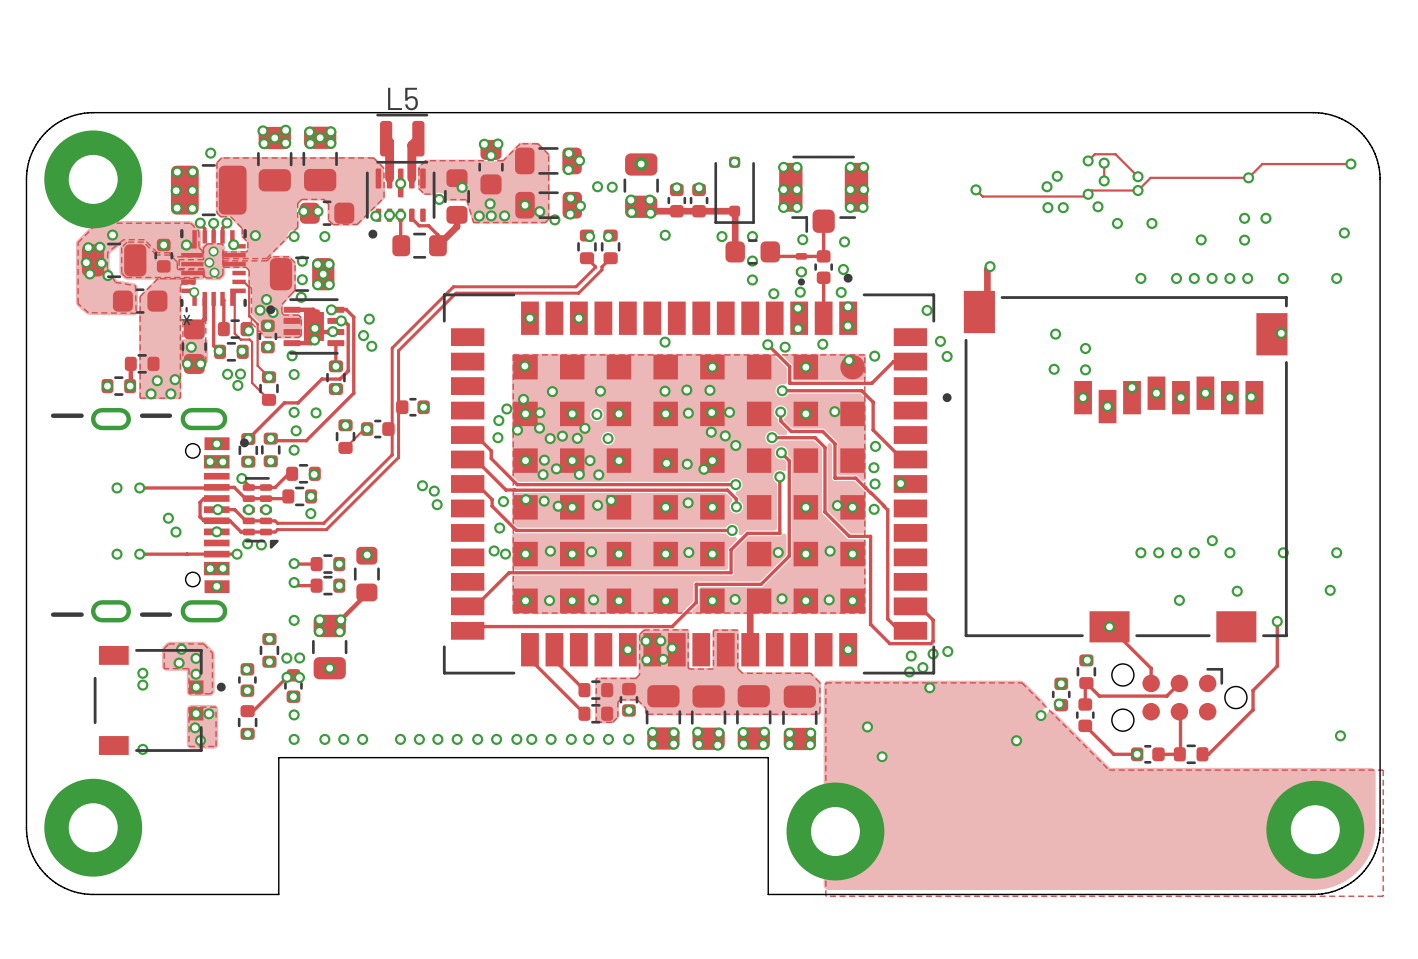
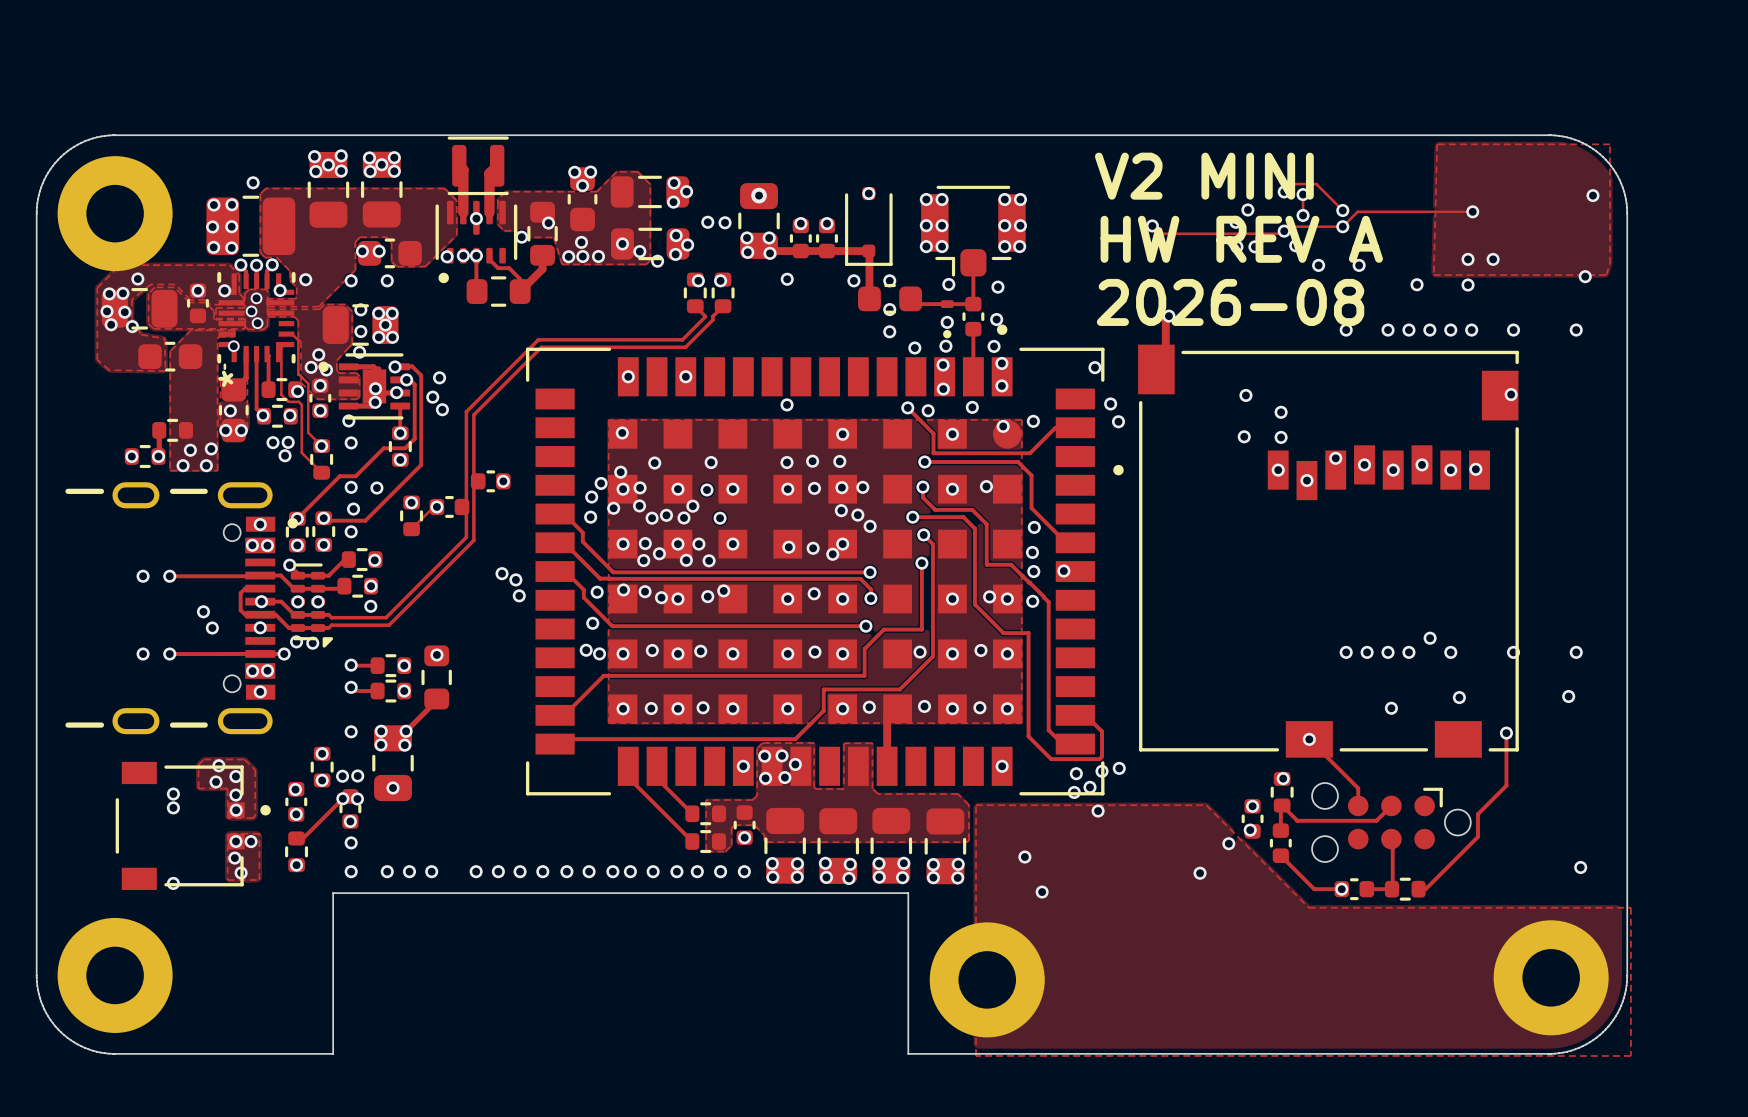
L5 name: L5 (402, 99) -> none
zone outline: none -> (1437, 144) (1433, 275) (1606, 275) (1609, 263) (1609, 144) (1437, 144)
text: none -> V2 MINI (1204, 176)
track: (1350, 164) (1262, 164) (1248, 177) -> none
text: none -> HW REV A (1241, 239)
text: none -> 2026-08 (1230, 302)

